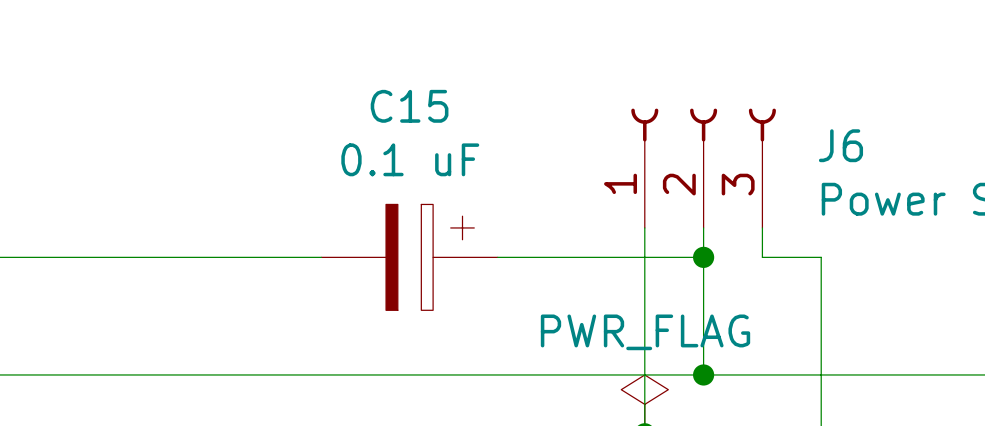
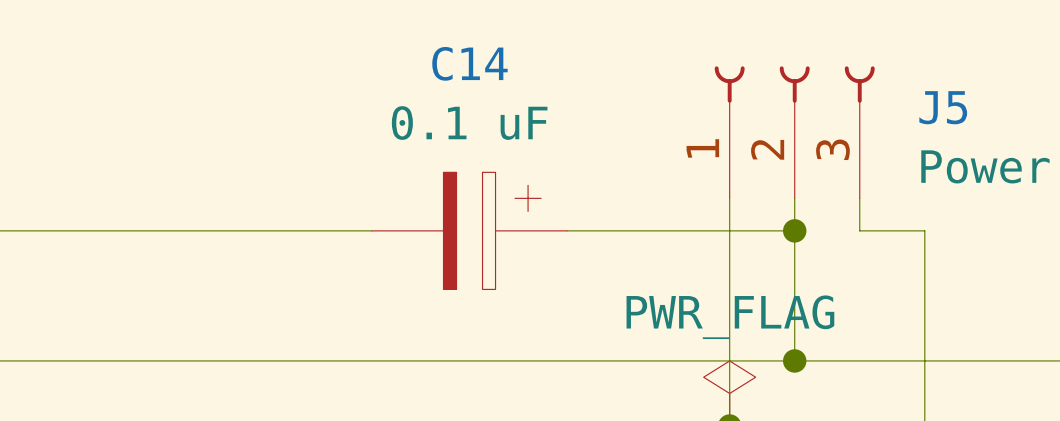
C15 name: C15 (409, 106) -> C14 (469, 63)
J6 name: J6 (840, 145) -> J5 (943, 107)

